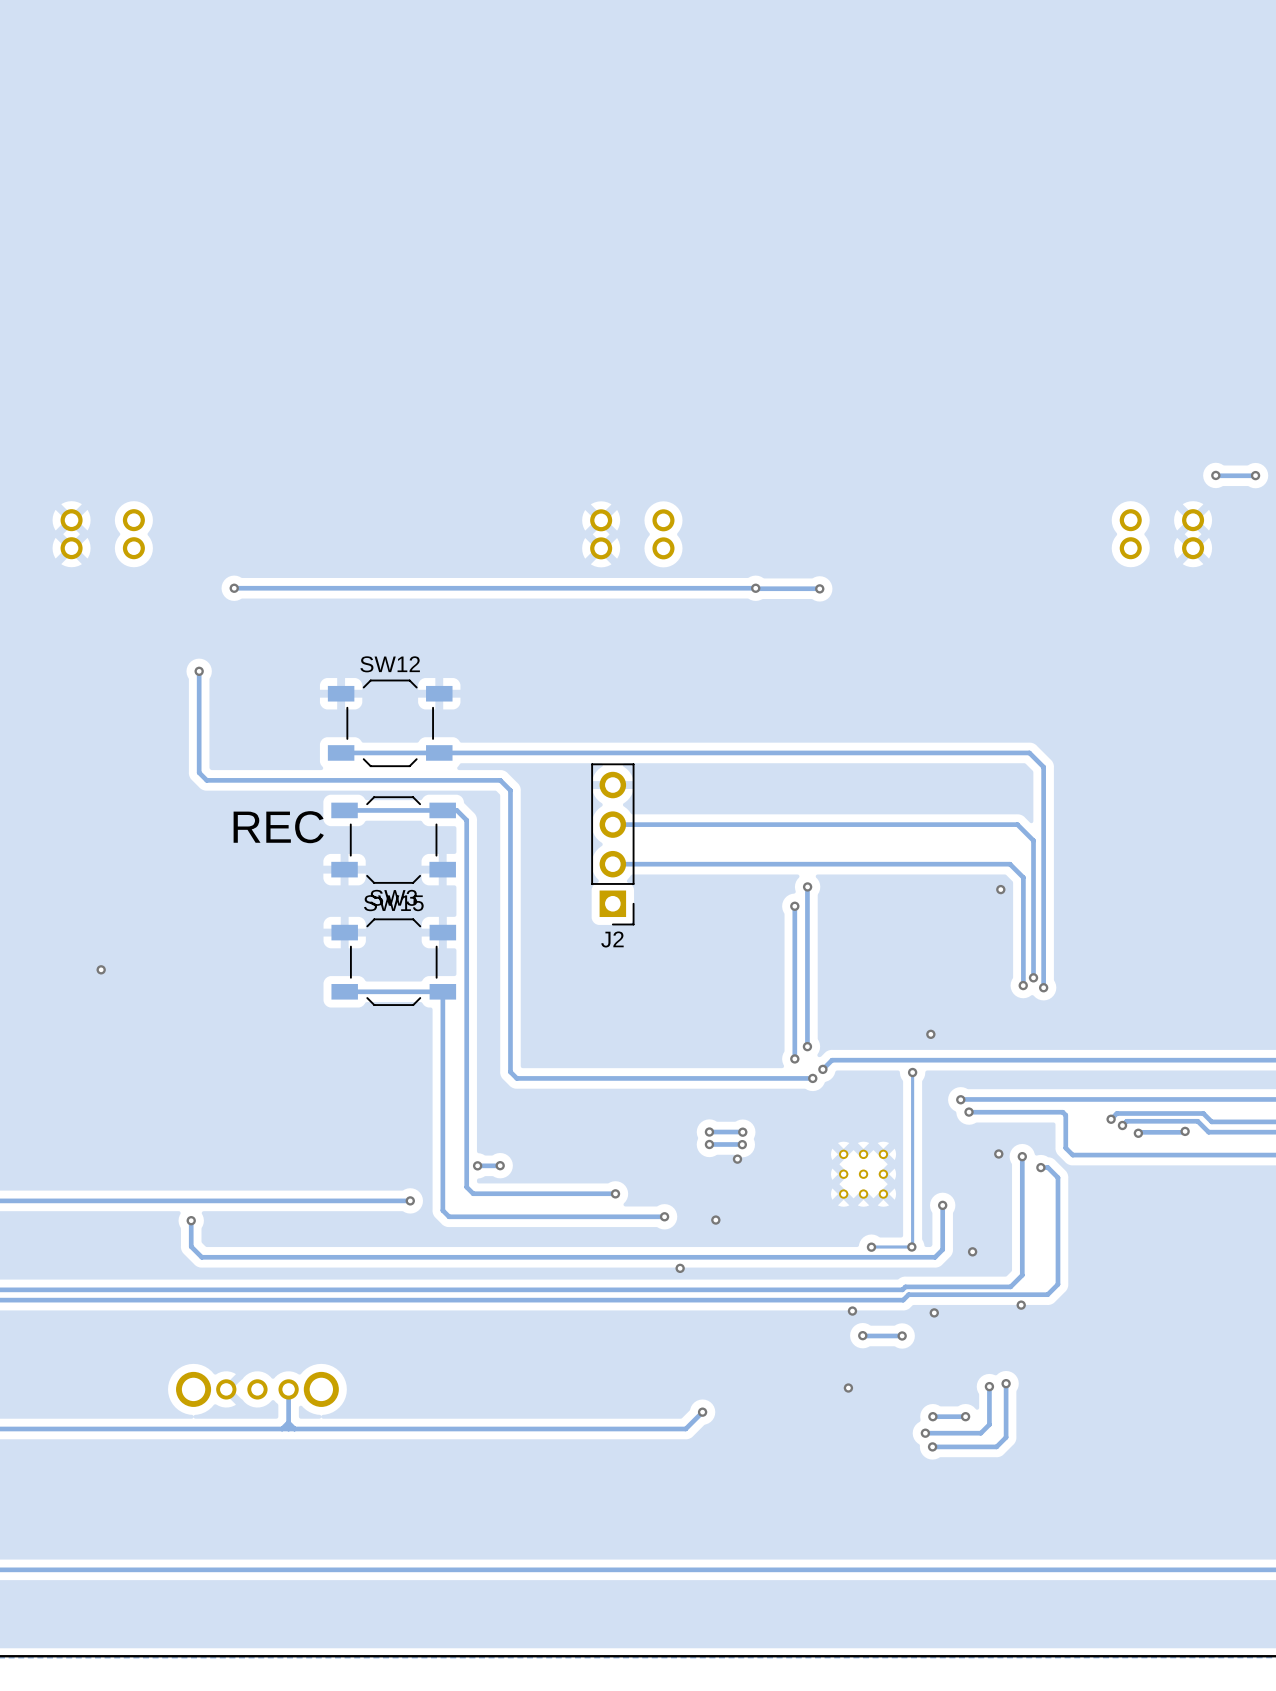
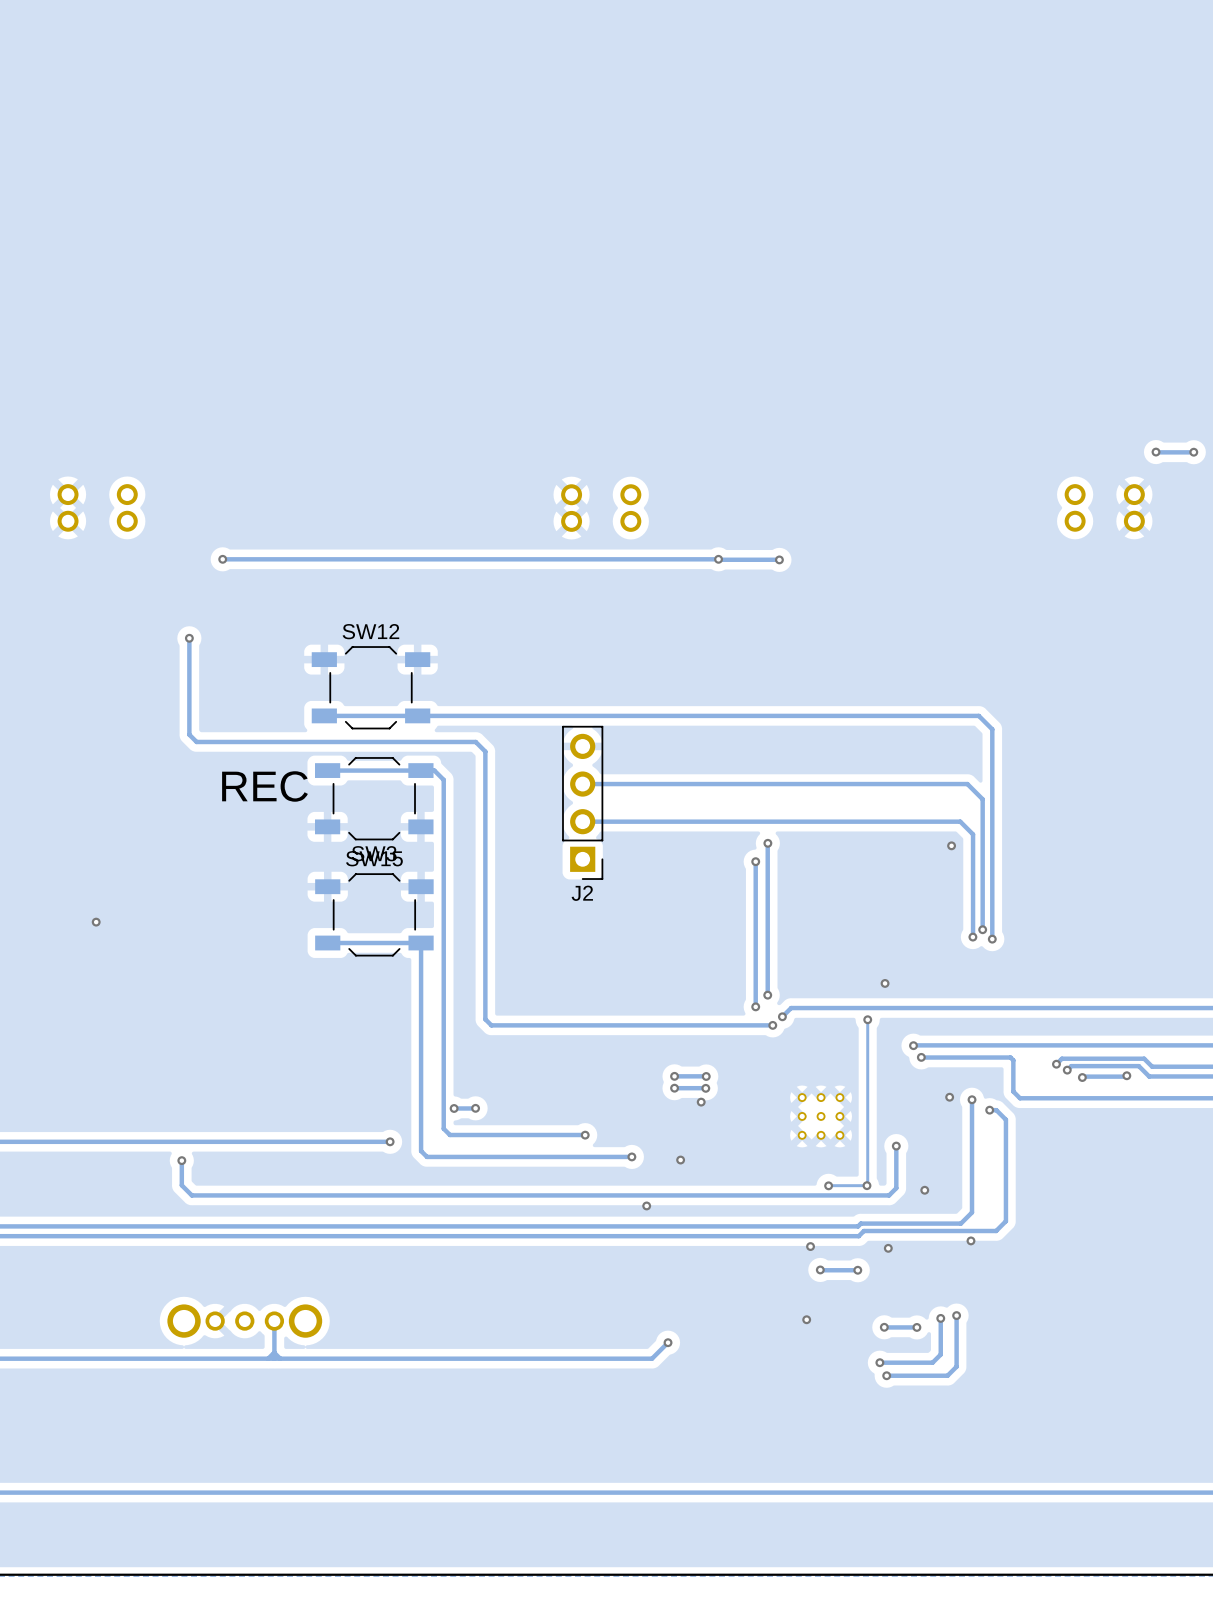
via: none -> (884, 1327)
track: none -> (916, 1327) (884, 1327)
via: none -> (916, 1327)
via: (932, 1416) -> none
track: (965, 1416) (932, 1416) -> none
via: (965, 1416) -> none

